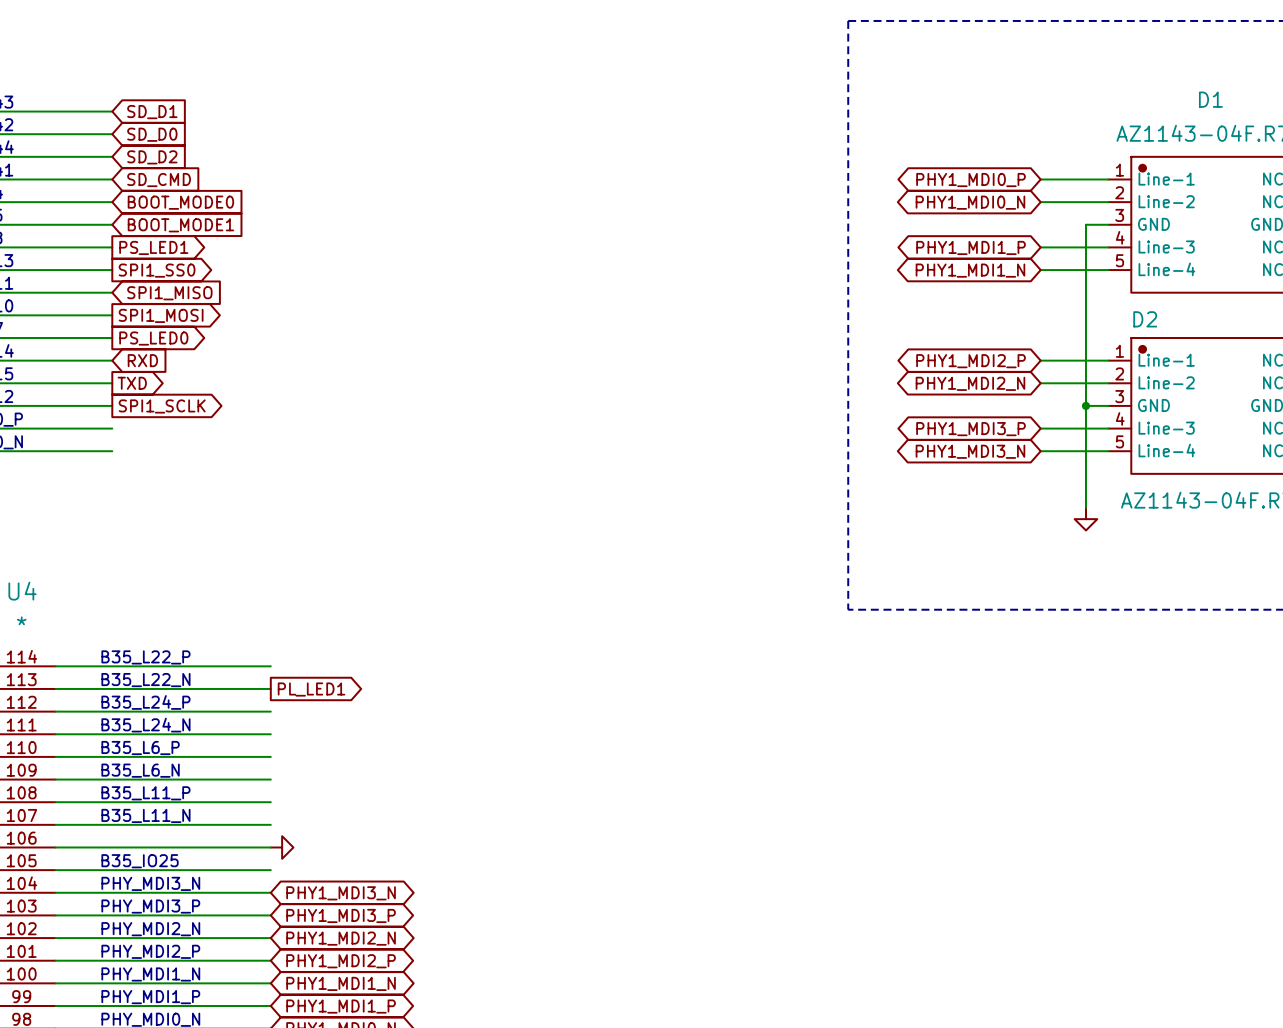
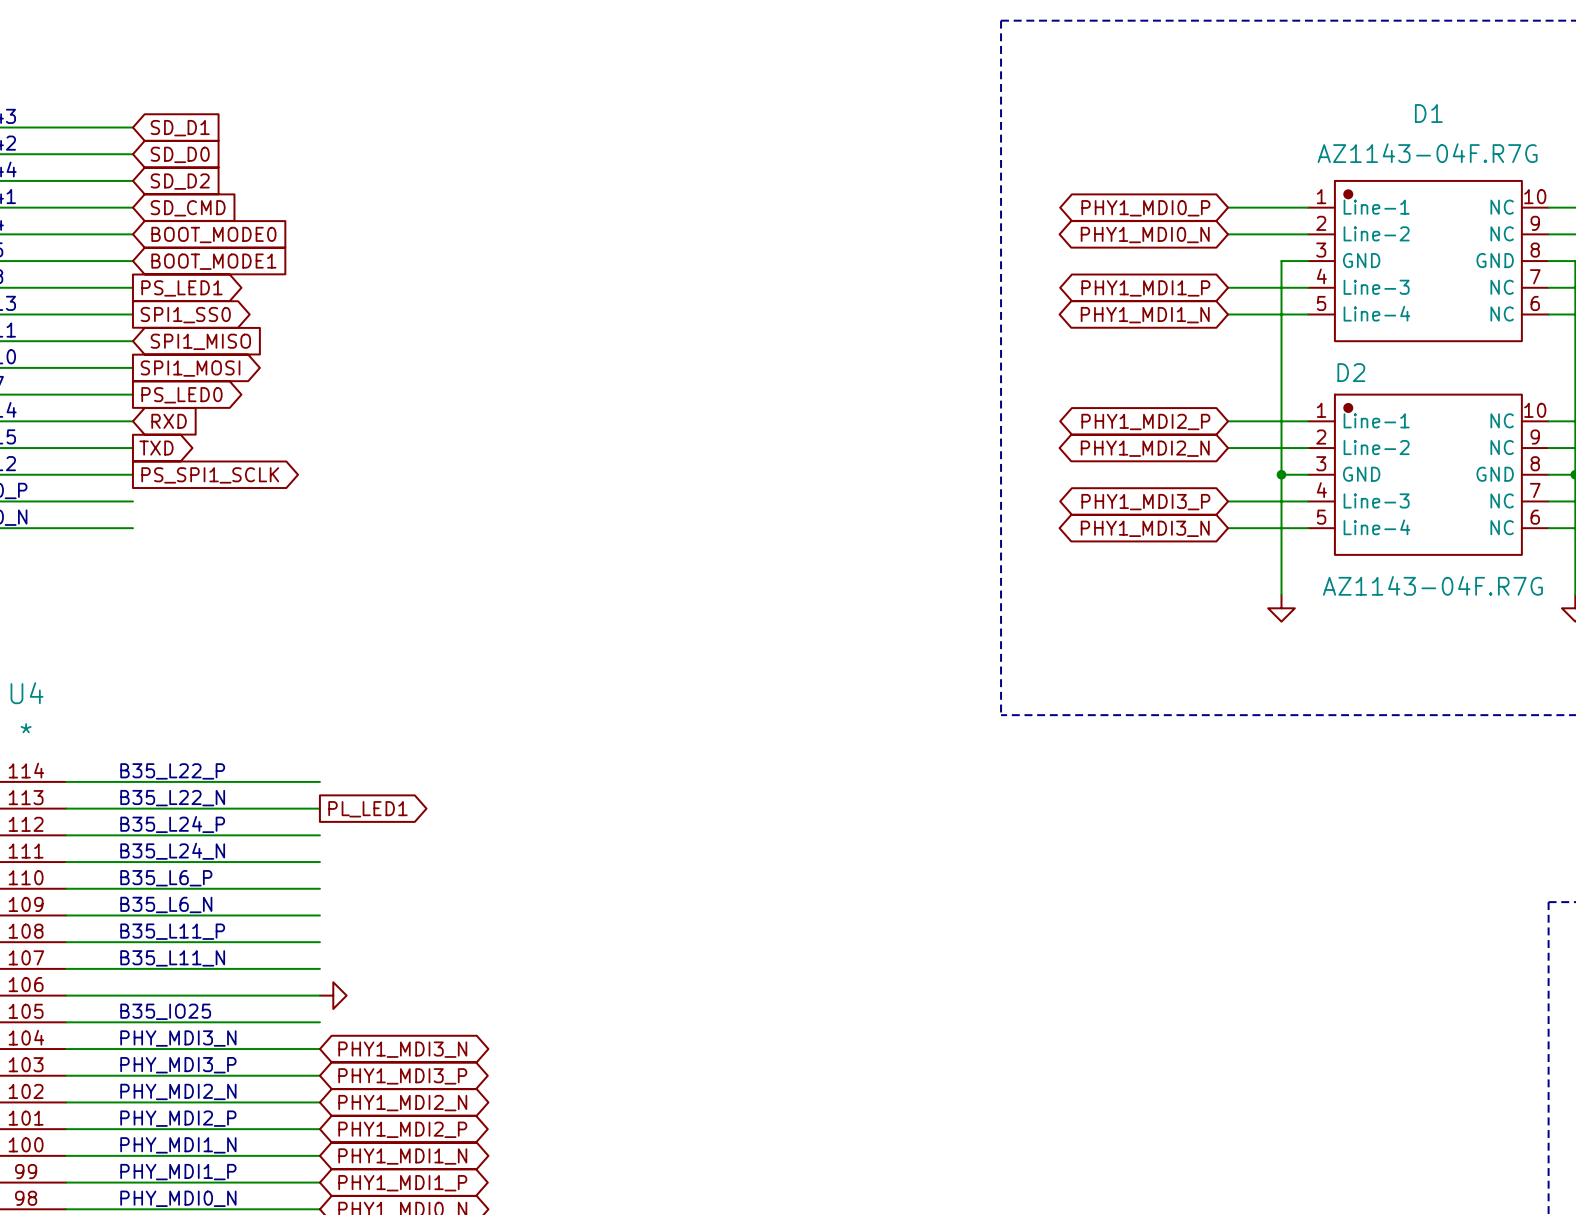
global label: SPI1_SCLK (162, 406) -> PS_SPI1_SCLK (210, 475)

